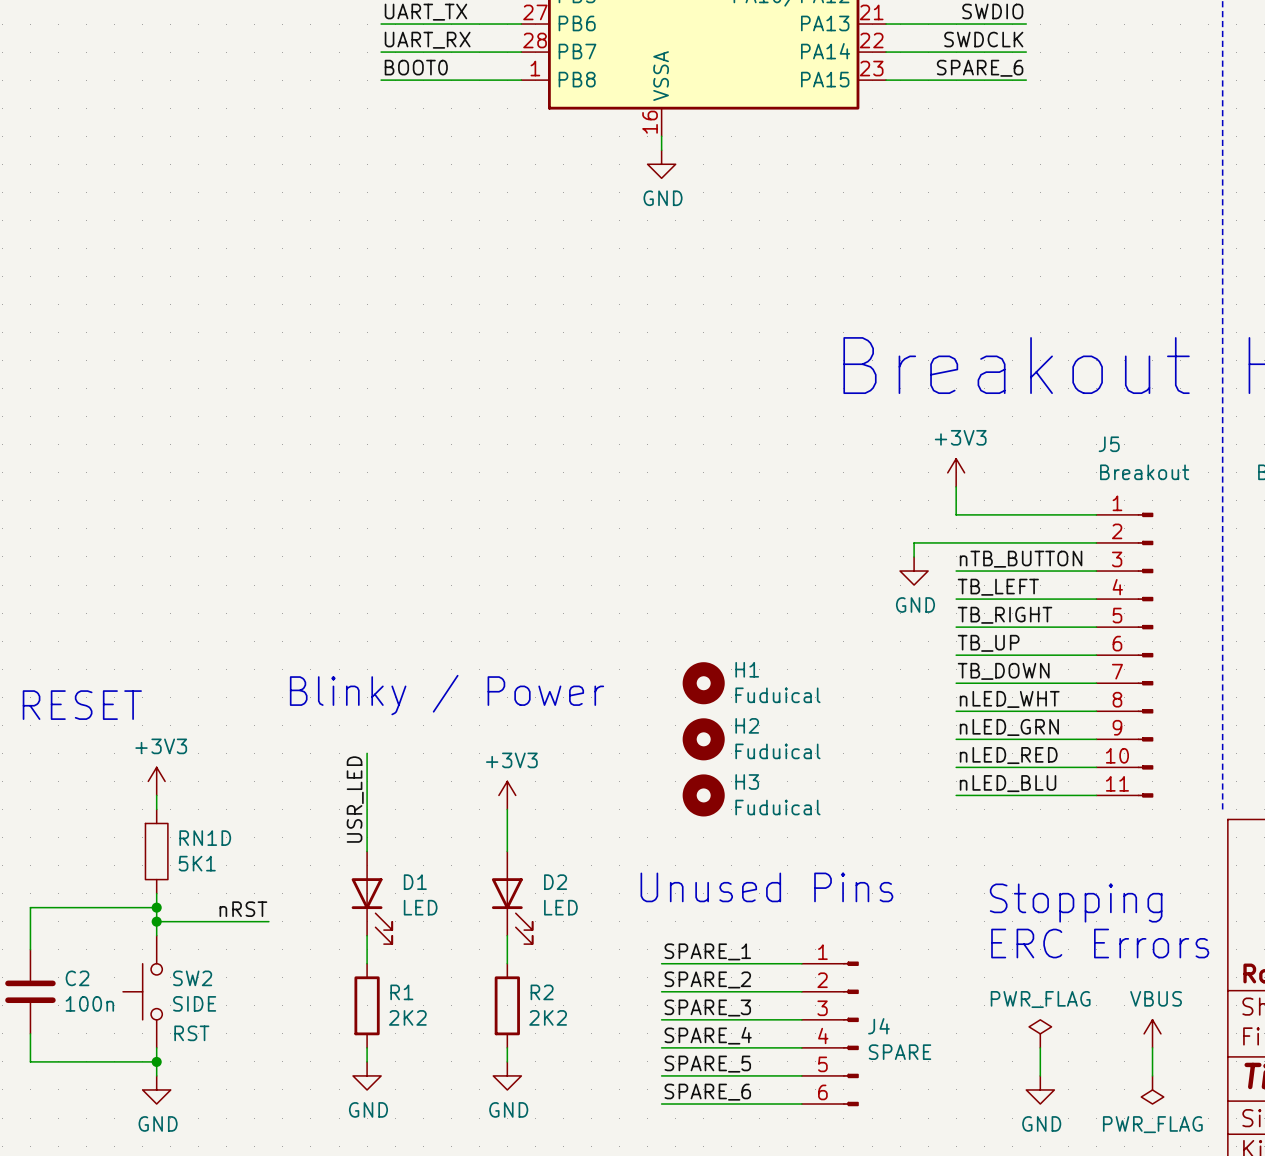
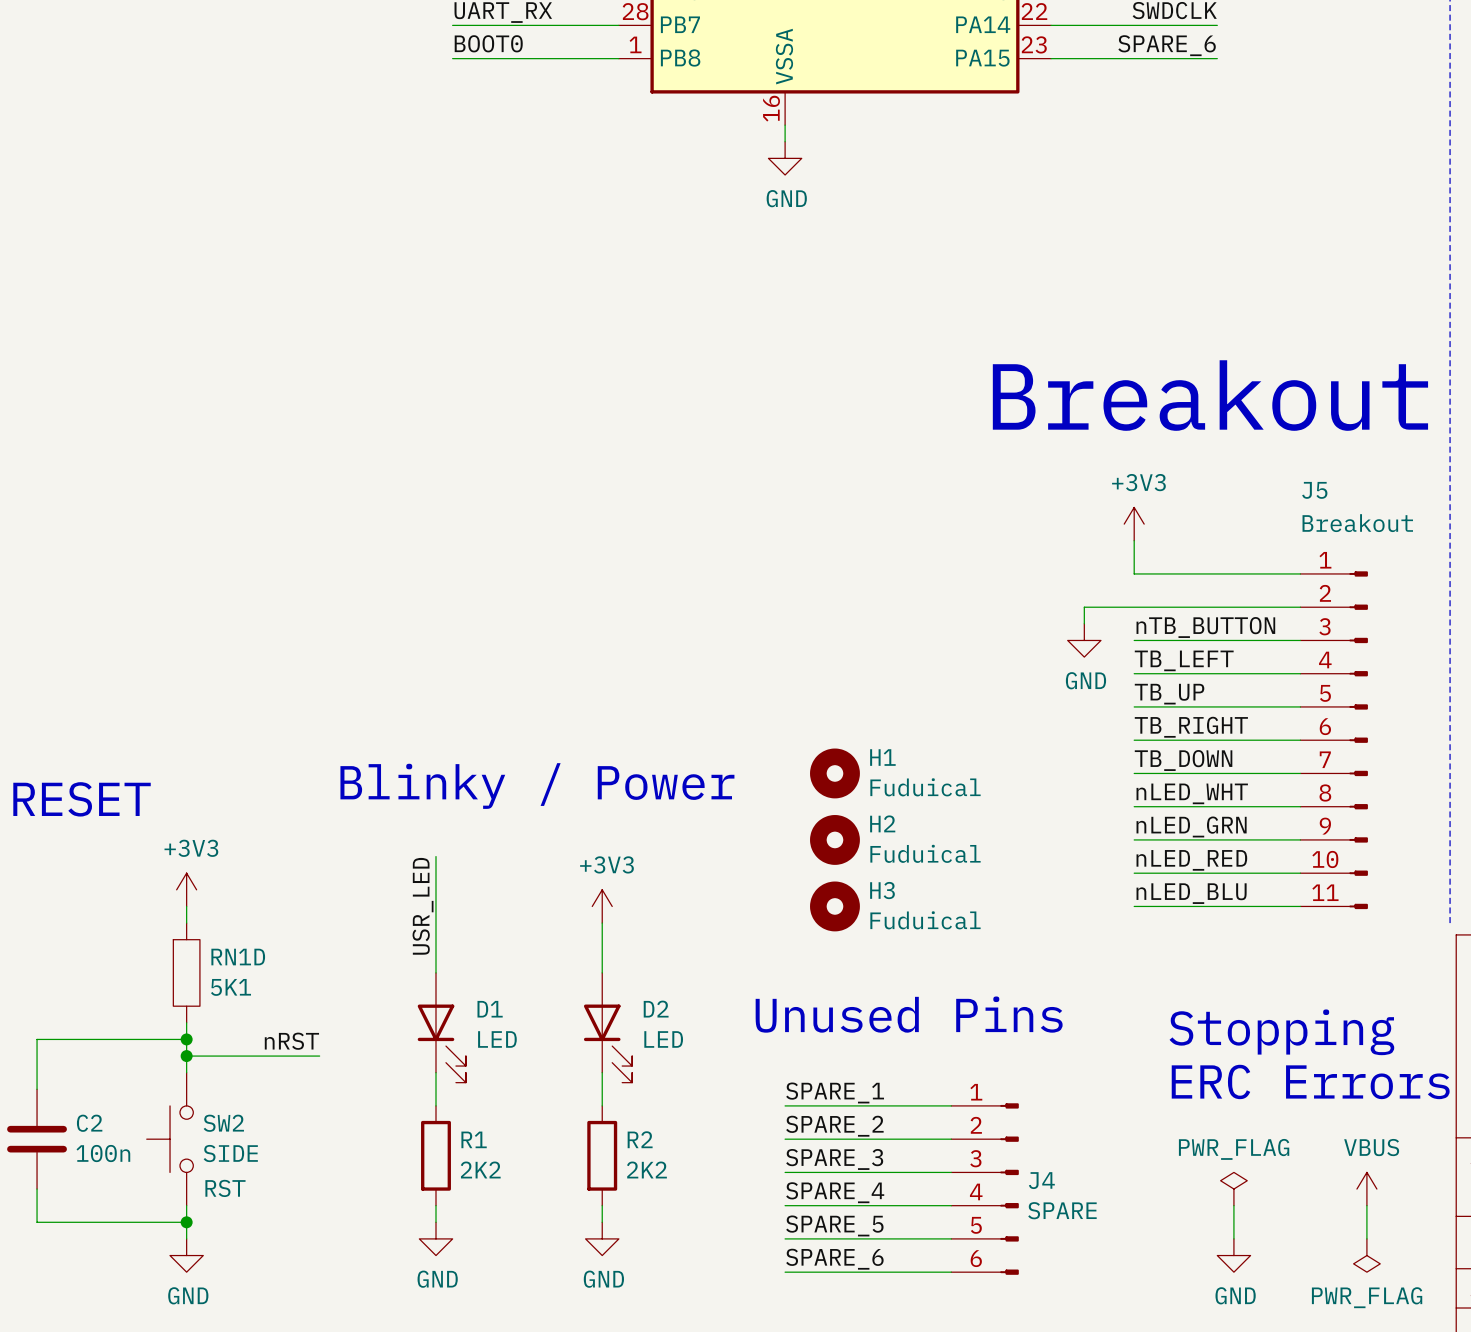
label: TB_RIGHT (1005, 615) -> TB_UP (1169, 694)
label: TB_UP (988, 643) -> TB_RIGHT (1191, 727)

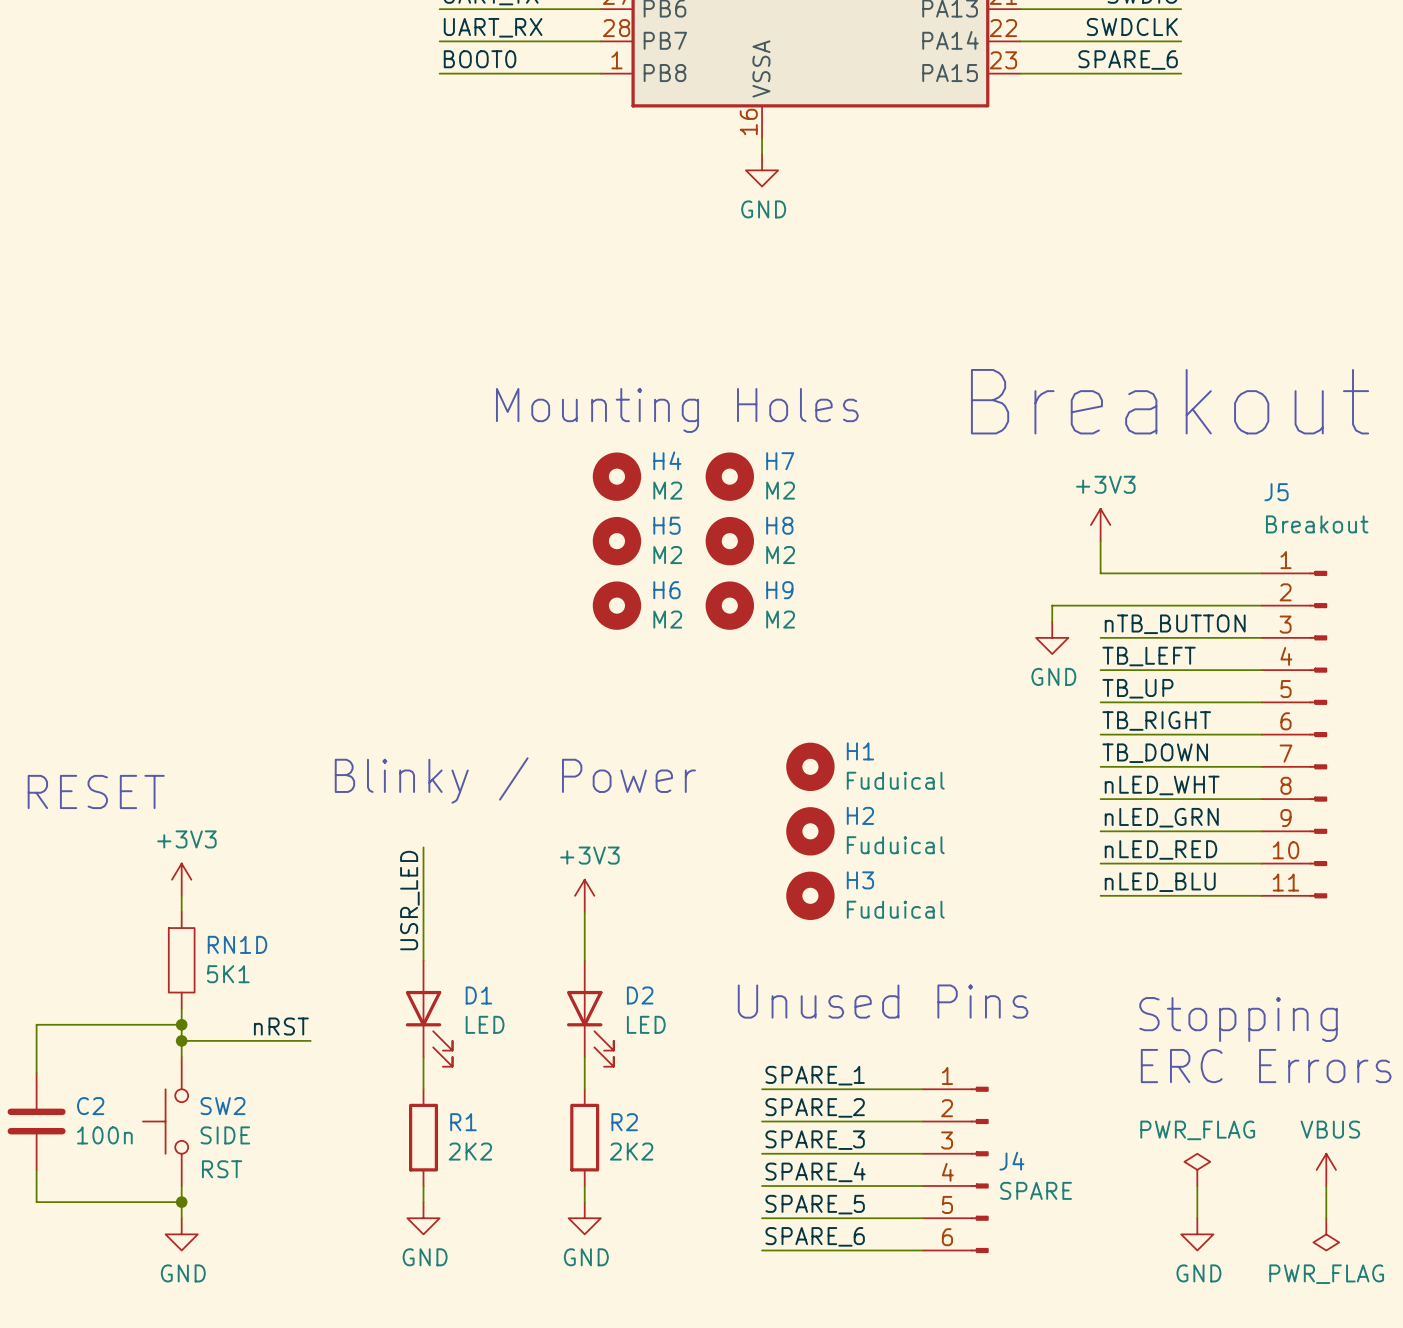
text: none -> Mounting Holes (677, 410)
H4: none -> M2 (616, 476)
H7: none -> M2 (729, 476)
H5: none -> M2 (616, 541)
H8: none -> M2 (729, 541)
H6: none -> M2 (616, 605)
H9: none -> M2 (729, 605)

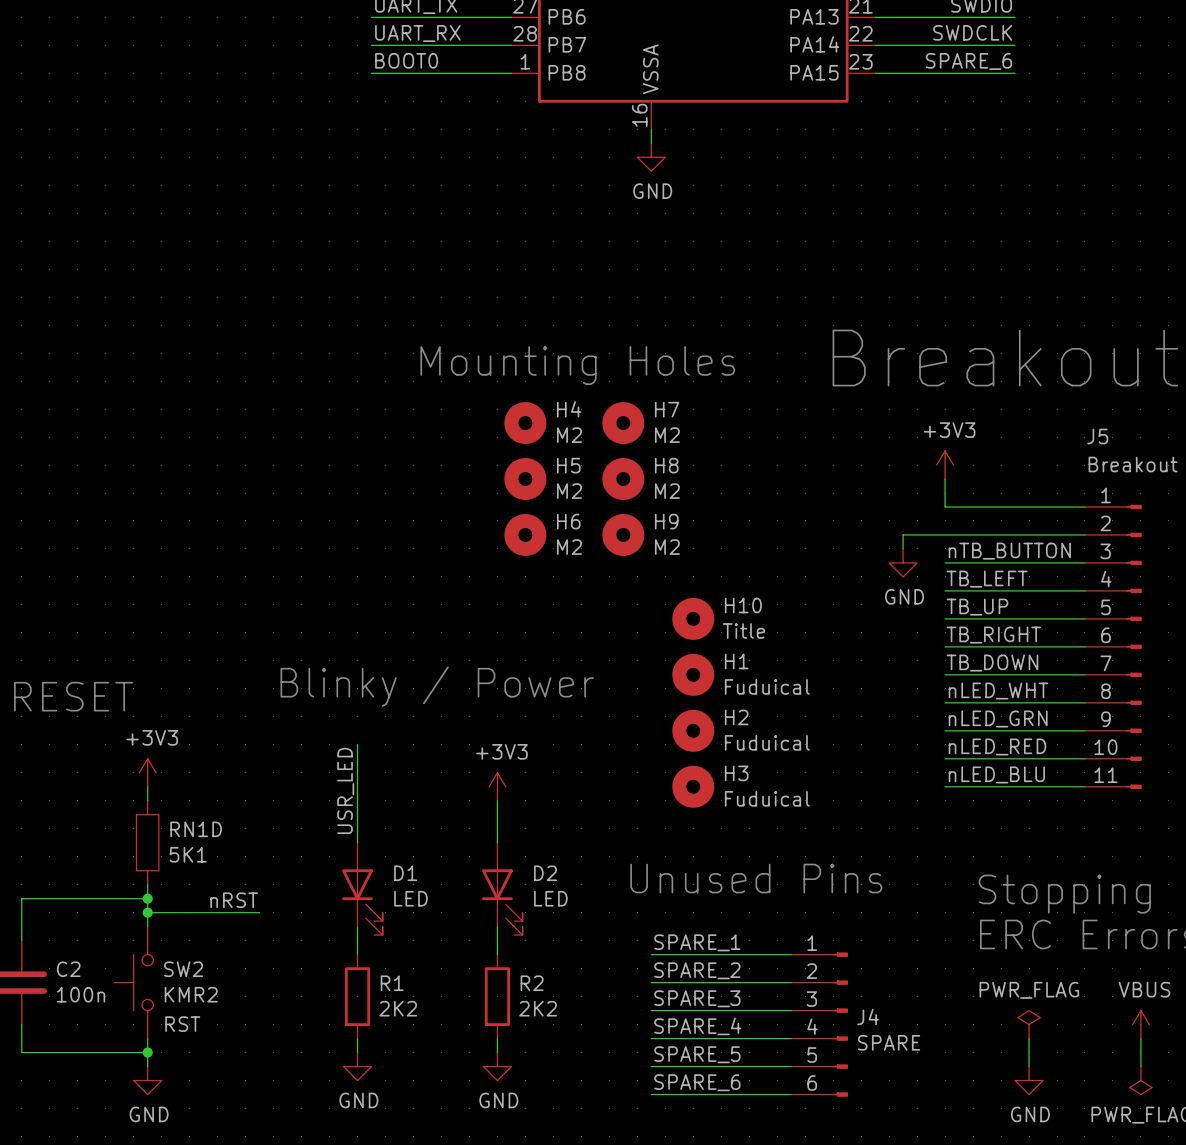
H10: none -> Title (693, 618)
SW2 value: SIDE (225, 1135) -> KMR2 (191, 994)

